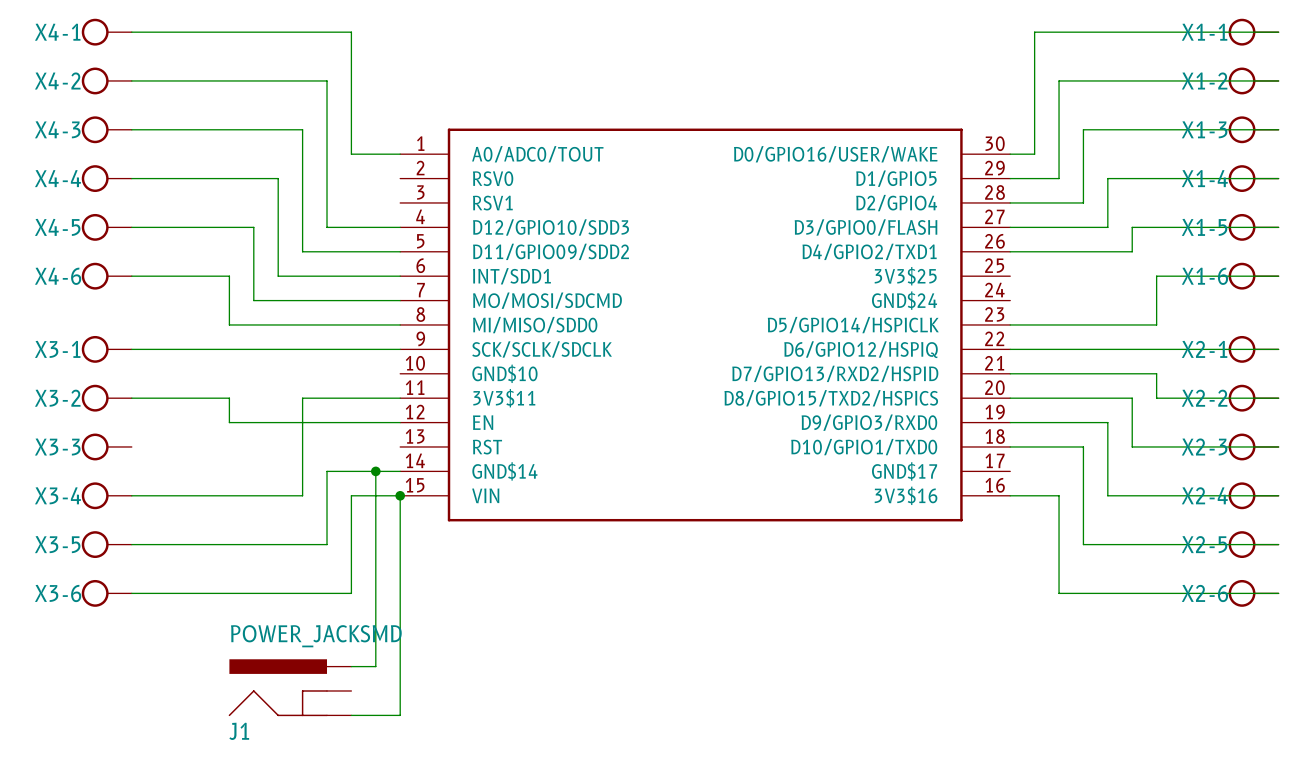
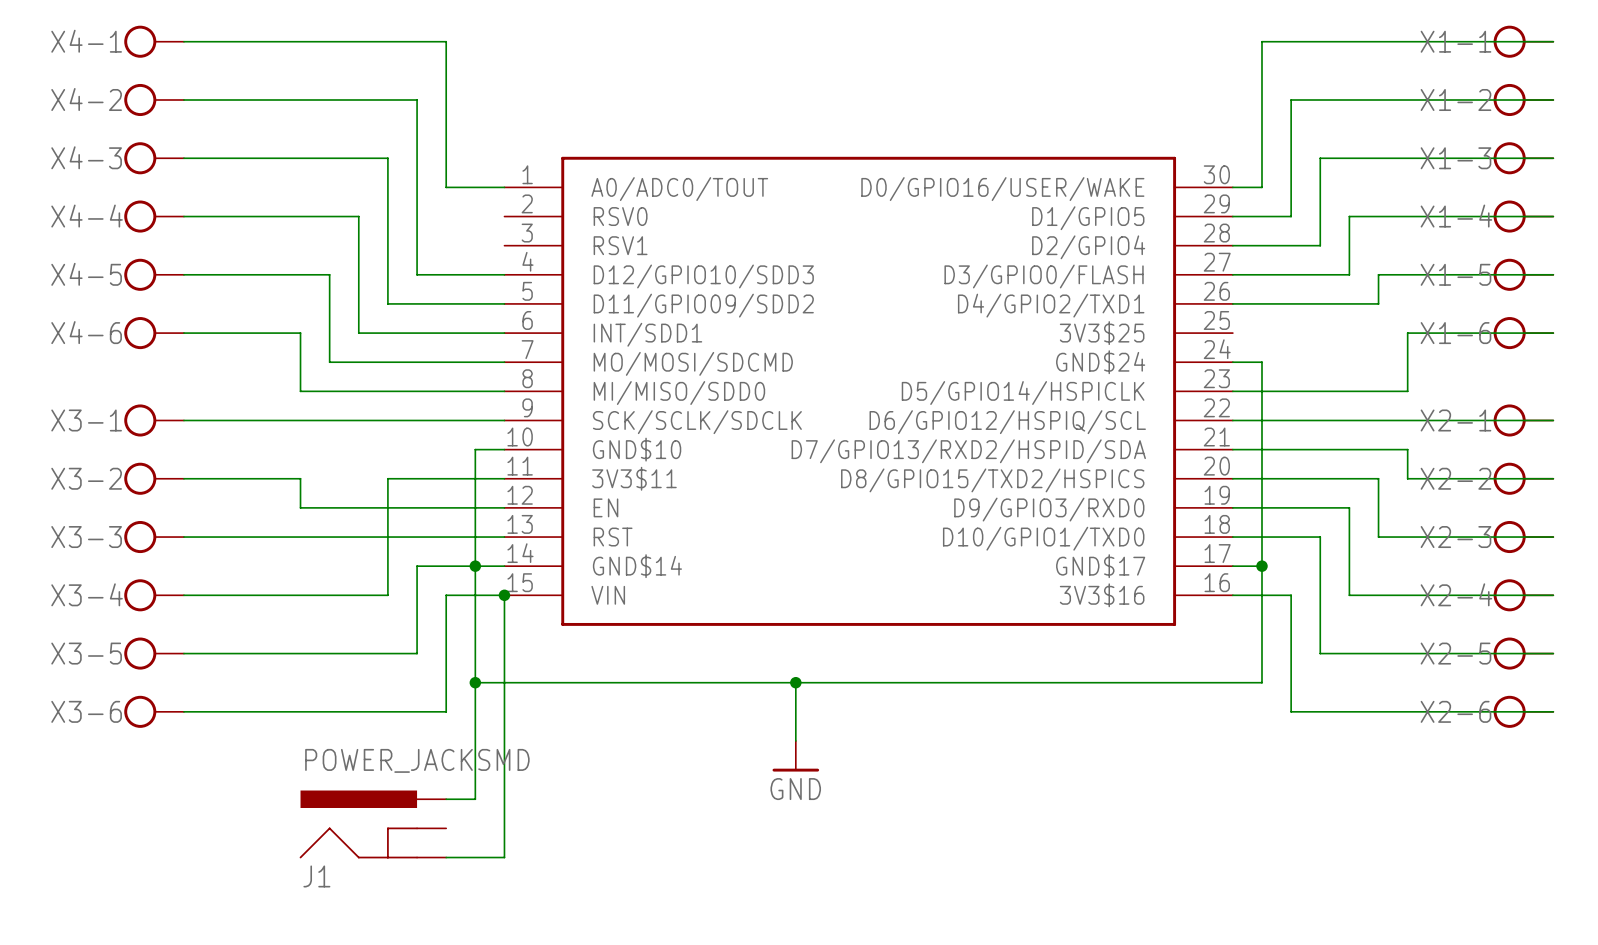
wire: none -> (1232, 362) (1261, 362) (1261, 682) (475, 682)
part pin name: D6/GPIO12/HSPIQ (861, 349) -> D6/GPIO12/HSPIQ/SCL (1007, 422)
wire: none -> (504, 449) (475, 449) (475, 566)
part pin name: D7/GPIO13/RXD2/HSPID (835, 373) -> D7/GPIO13/RXD2/HSPID/SDA (968, 451)
wire: none -> (183, 537) (504, 537)
wire: none -> (1232, 566) (1261, 566)
junction: none -> (1261, 566)
junction: none -> (475, 682)
wire: none -> (795, 682) (795, 740)
junction: none -> (795, 682)
power symbol: none -> GND (795, 756)

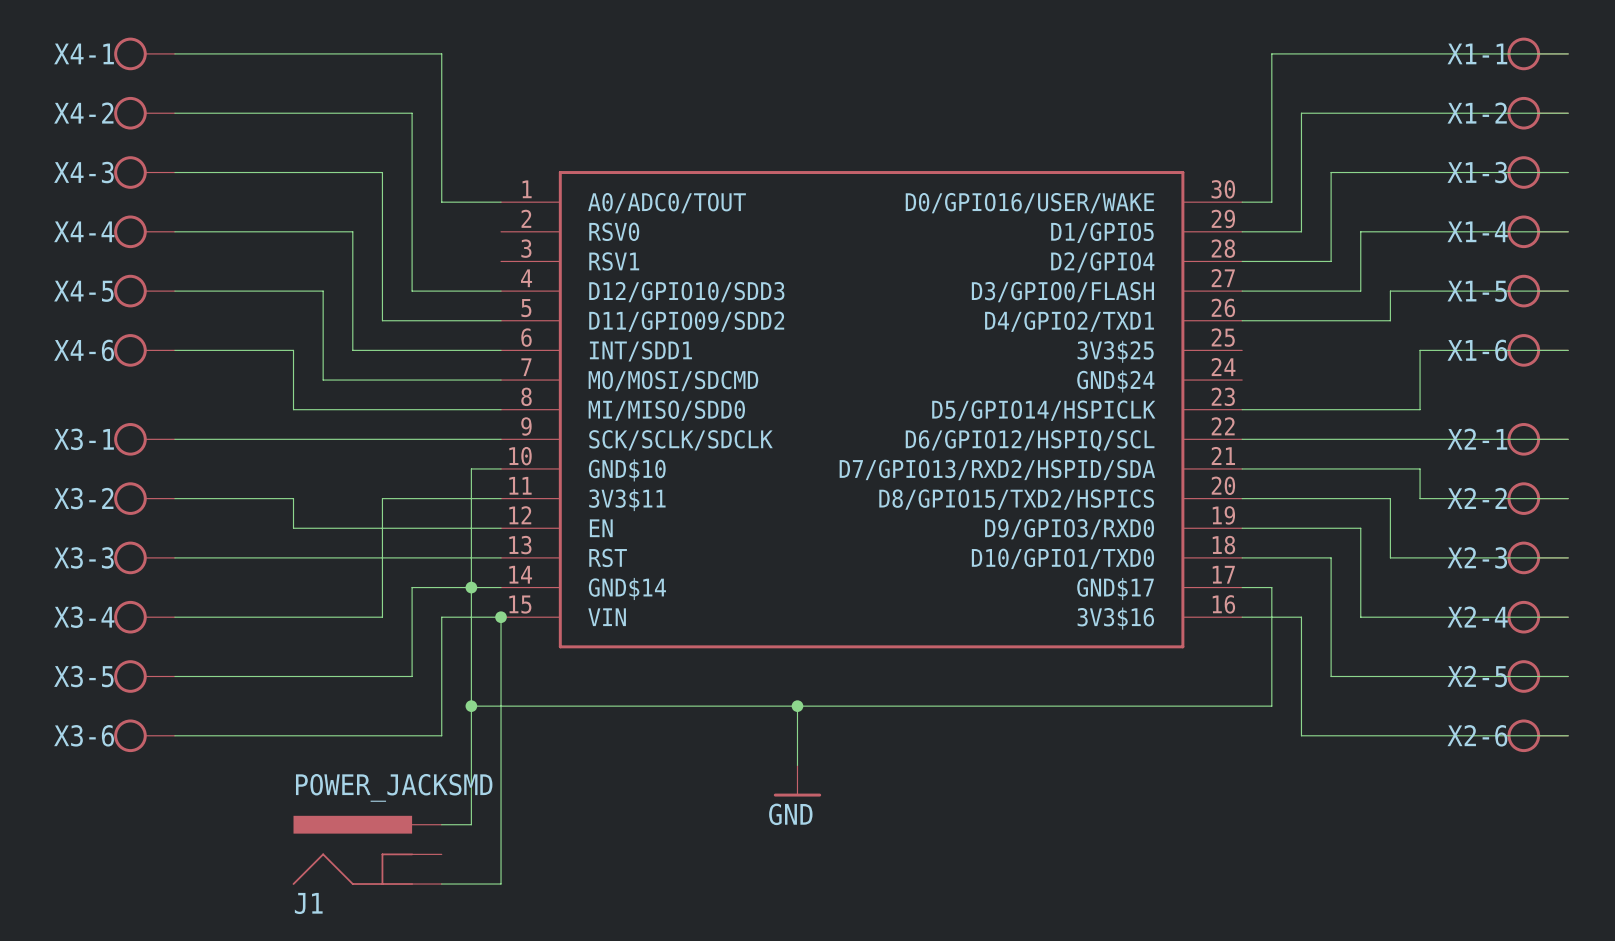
wire: (1232, 362) (1261, 362) (1261, 566) -> none
junction: (1261, 566) -> none

